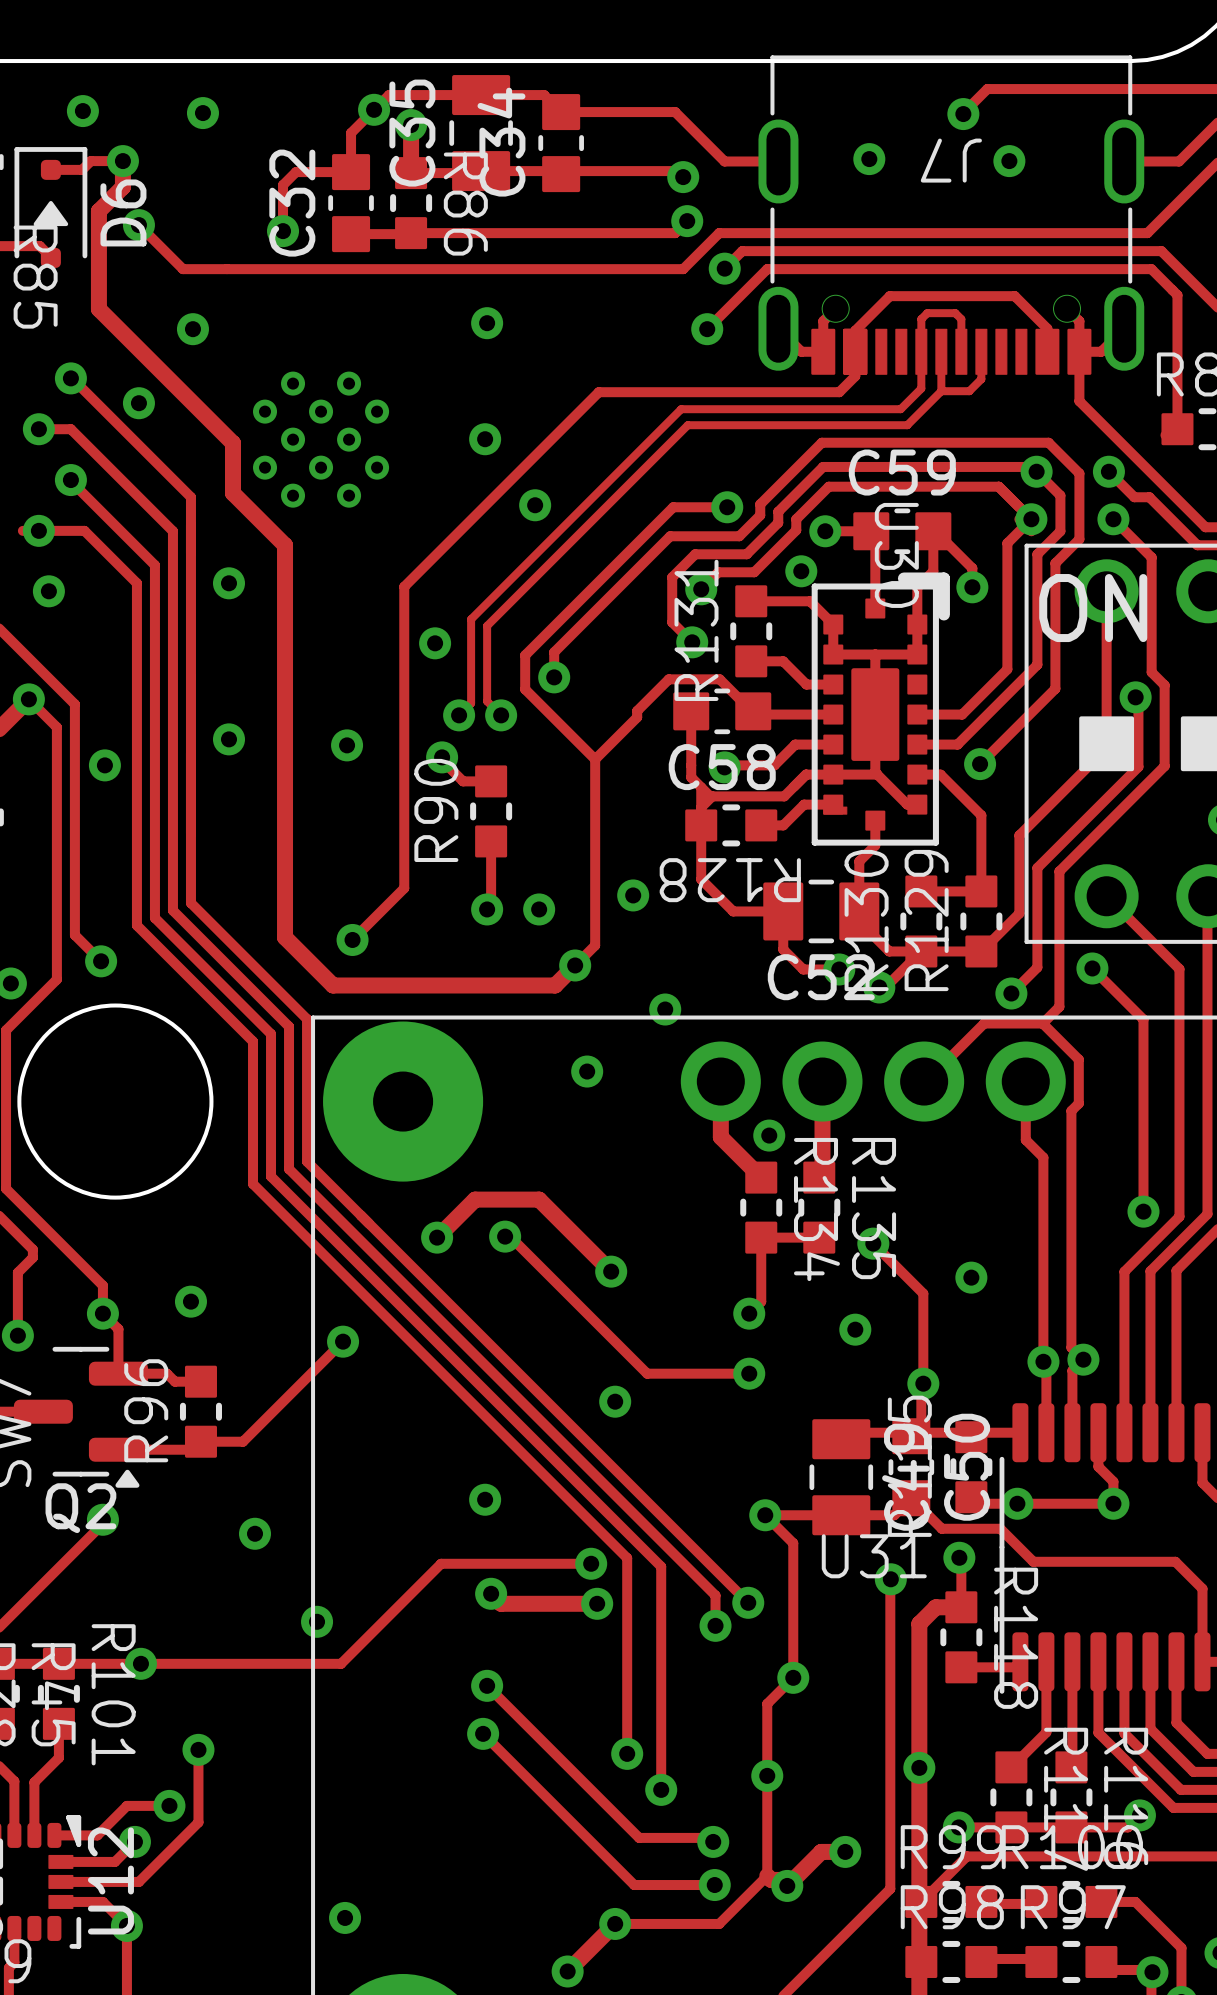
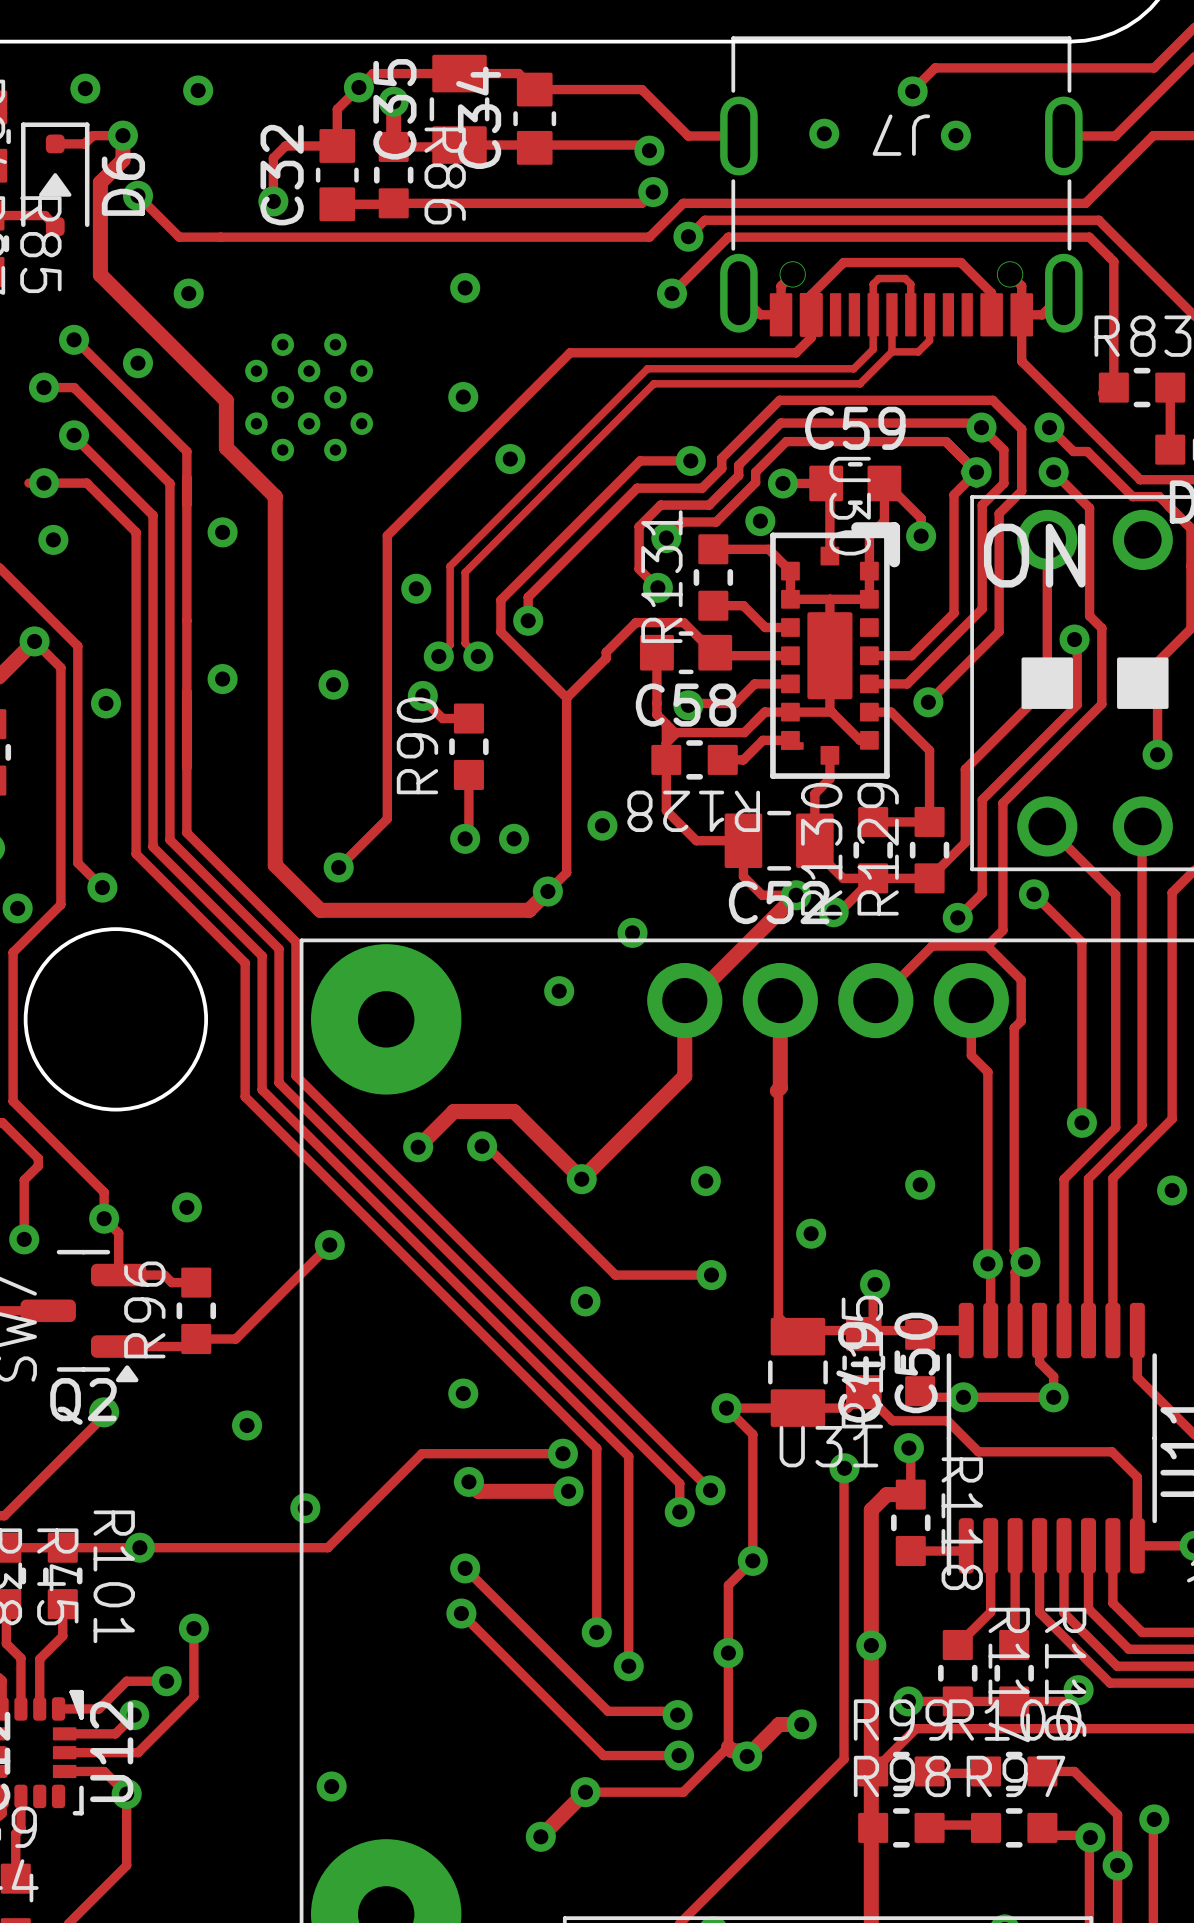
track: none -> (796, 895) (690, 1000)
track: none -> (778, 1004) (778, 1317) (797, 1336)
via: (769, 1135) -> none
track: (720, 1137) (761, 1177) -> (684, 1052) (684, 1076) (581, 1179)
R134: (761, 1207) -> none
R135: (819, 1207) -> none
track: (819, 1237) (761, 1237) (761, 1301) (749, 1313) -> none
track: (873, 1243) (923, 1293) (923, 1383) -> none
via: (873, 1243) -> none
via position: (749, 1313) -> (705, 1181)

